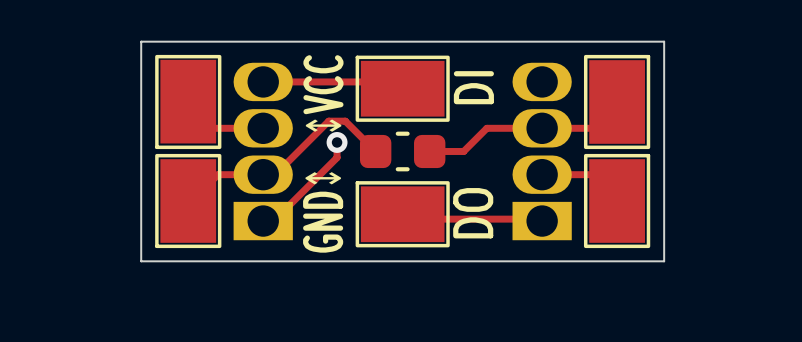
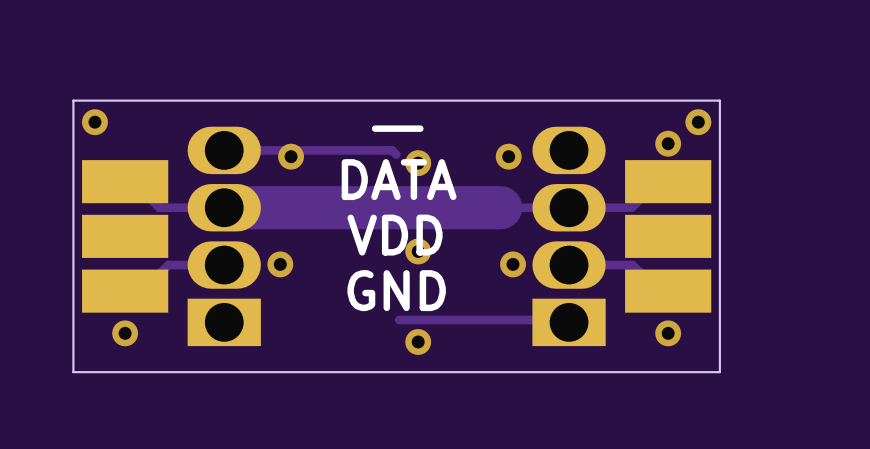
via: none -> (94, 122)
via: none -> (698, 122)
line: none -> (375, 128) (420, 128)
via: none -> (668, 143)
via: none -> (291, 156)
via: none -> (508, 156)
DI: (402, 88) -> none
via: none -> (418, 163)
text: ↕VCC (323, 94) -> none
part: (188, 101) -> none
part: (617, 101) -> none
text: none -> DATA (399, 179)
track: (486, 128) (463, 151) (429, 151) -> (500, 207) (224, 207)
track: (337, 142) (337, 157) (273, 221) (263, 221) -> none
via: (337, 142) -> none
text: none -> VDD (395, 235)
part: none -> (125, 236)
track: (375, 151) (345, 121) (328, 121) (275, 174) (263, 174) (269, 180) -> none
part: (402, 151) -> none
part: none -> (668, 236)
via: none -> (418, 251)
via: none -> (280, 264)
via: none -> (513, 264)
part: (188, 201) -> none
part: (617, 201) -> none
text: GND↕ (323, 211) -> GND (396, 290)
DO: (402, 214) -> none
via: none -> (125, 333)
via: none -> (668, 333)
via: none -> (418, 341)

